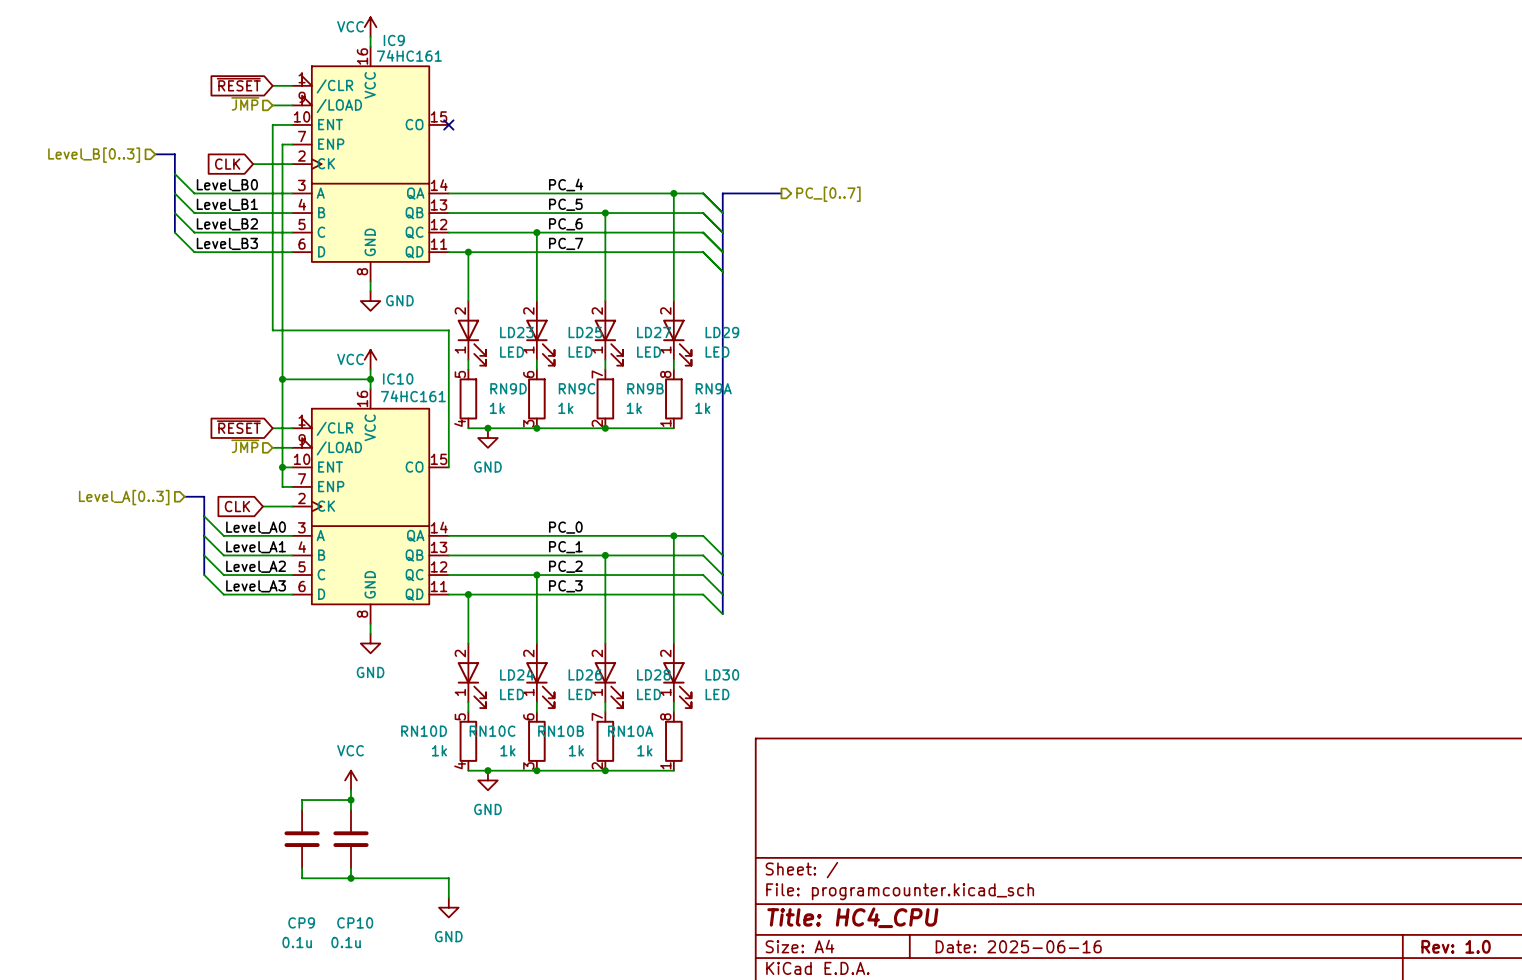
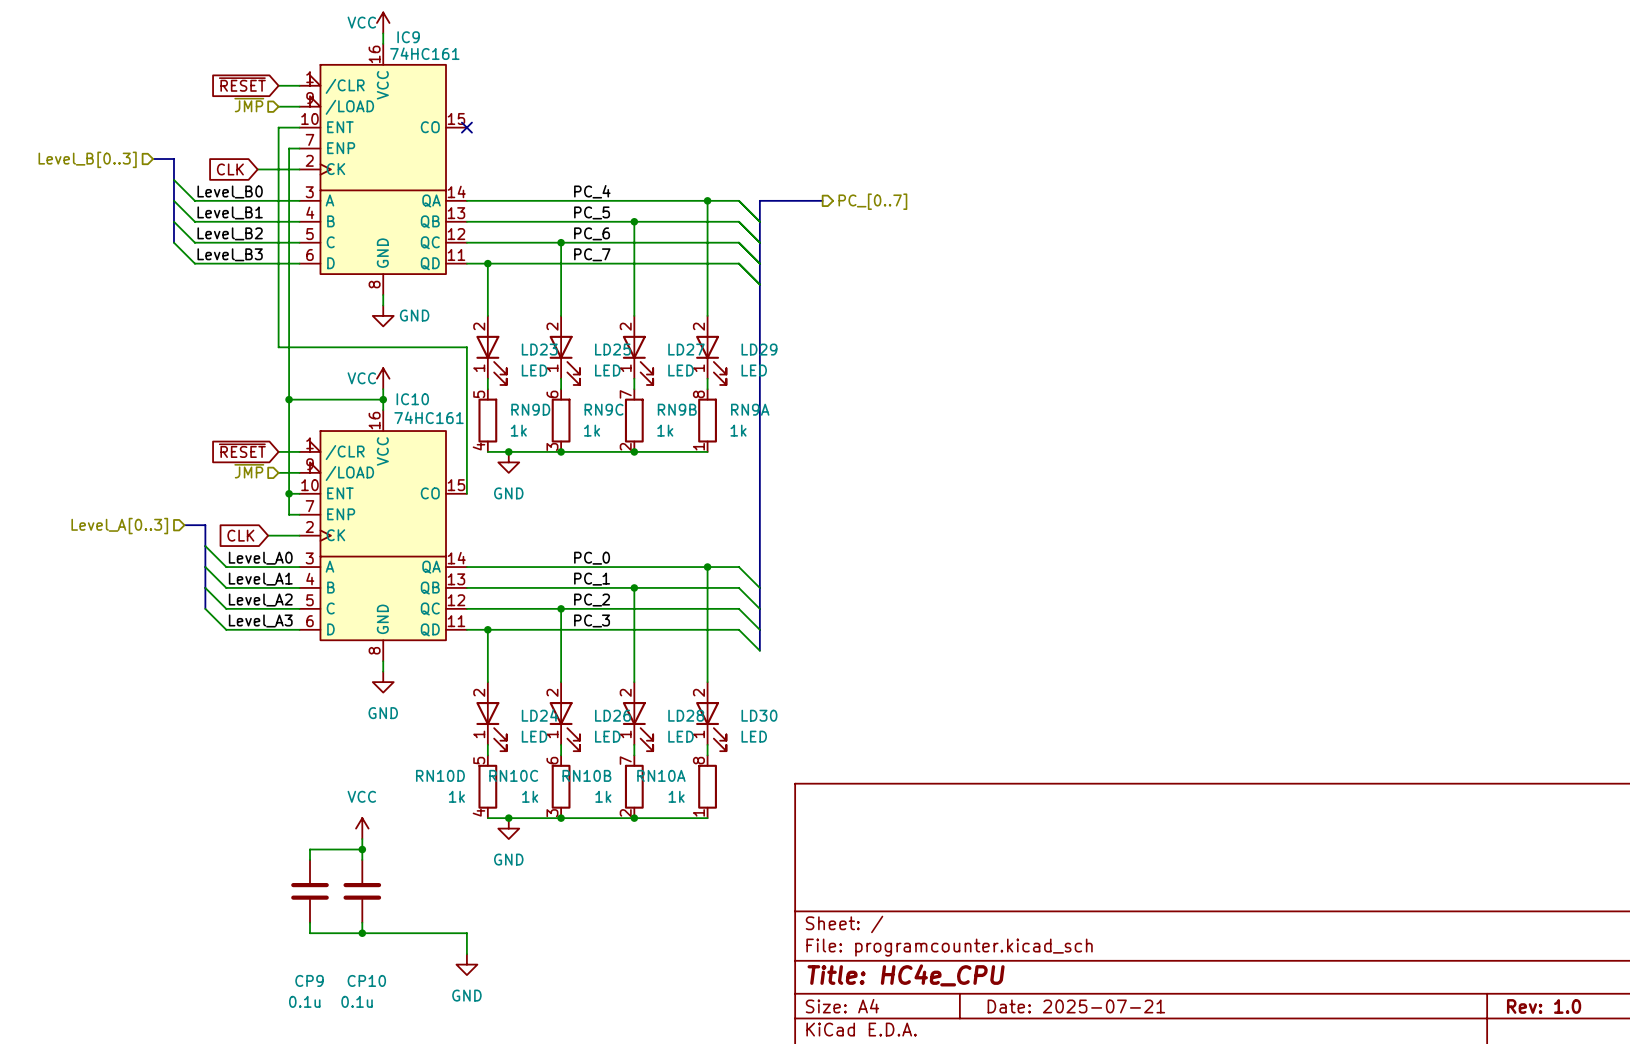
title block: Title: HC4_CPU (852, 917) -> Title: HC4e_CPU (906, 975)
title block: Date: 2025-06-16 (1018, 946) -> Date: 2025-07-21 (1076, 1006)

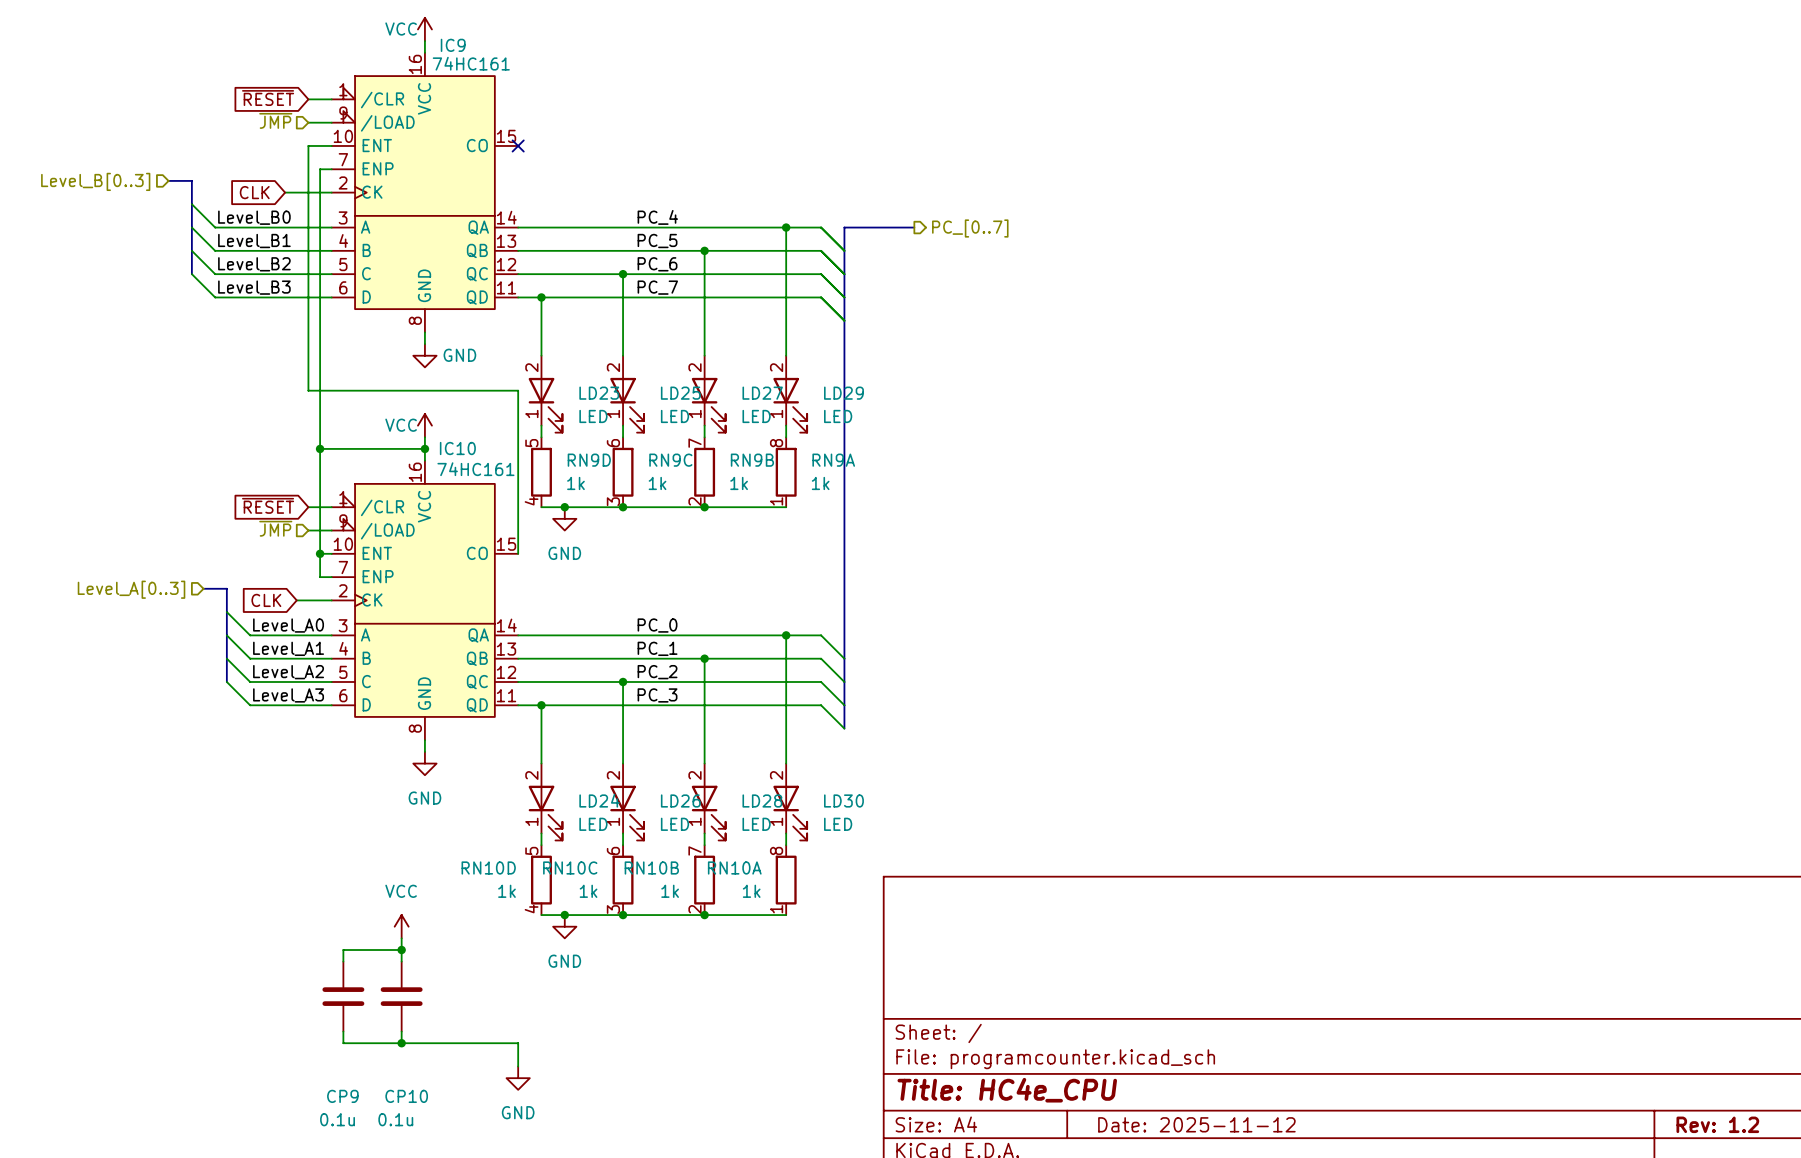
title block: Date: 2025-07-21 (1076, 1006) -> Date: 2025-11-12 (1196, 1124)
title block: Rev: 1.0 (1544, 1006) -> Rev: 1.2 (1717, 1124)

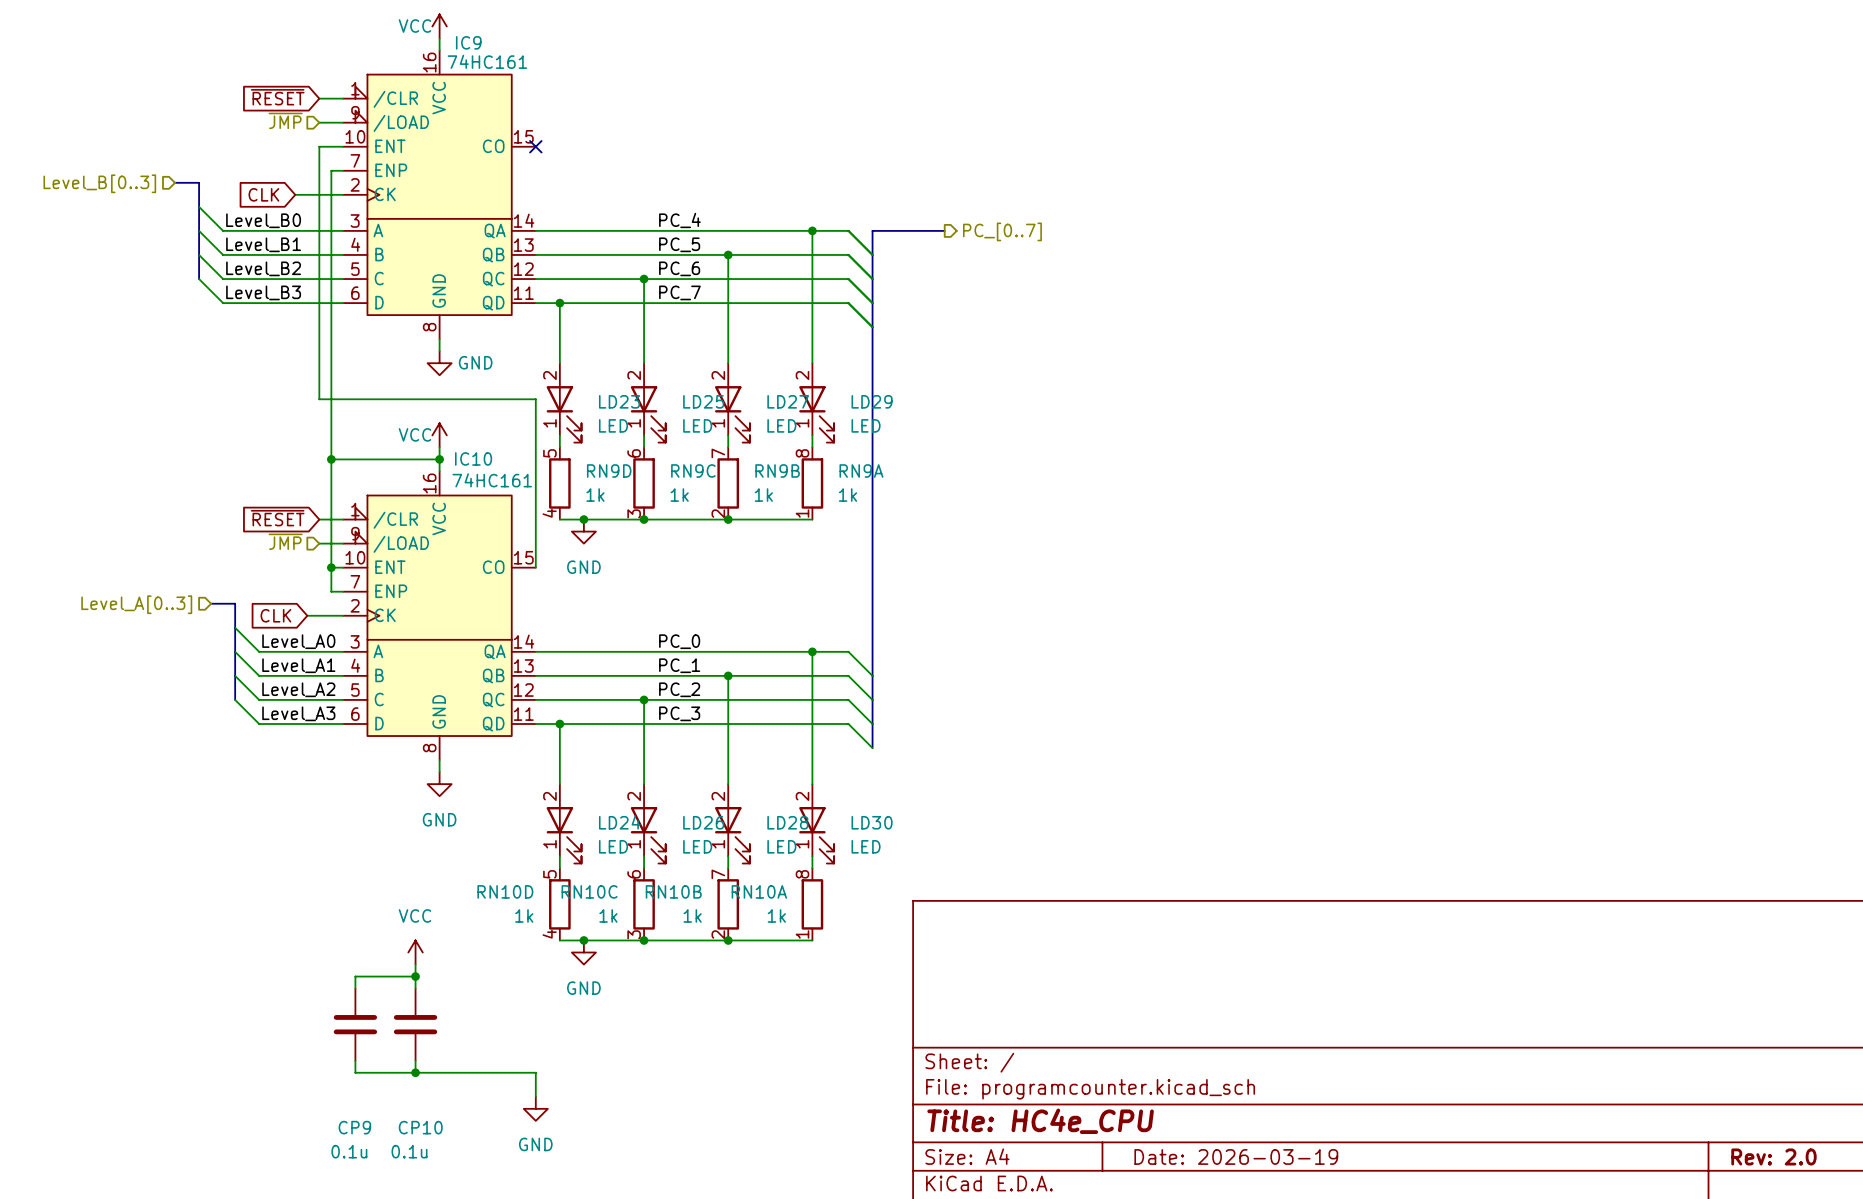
title block: Date: 2025-11-12 (1196, 1124) -> Date: 2026-03-19 (1236, 1156)
title block: Rev: 1.2 (1717, 1124) -> Rev: 2.0 (1773, 1156)

